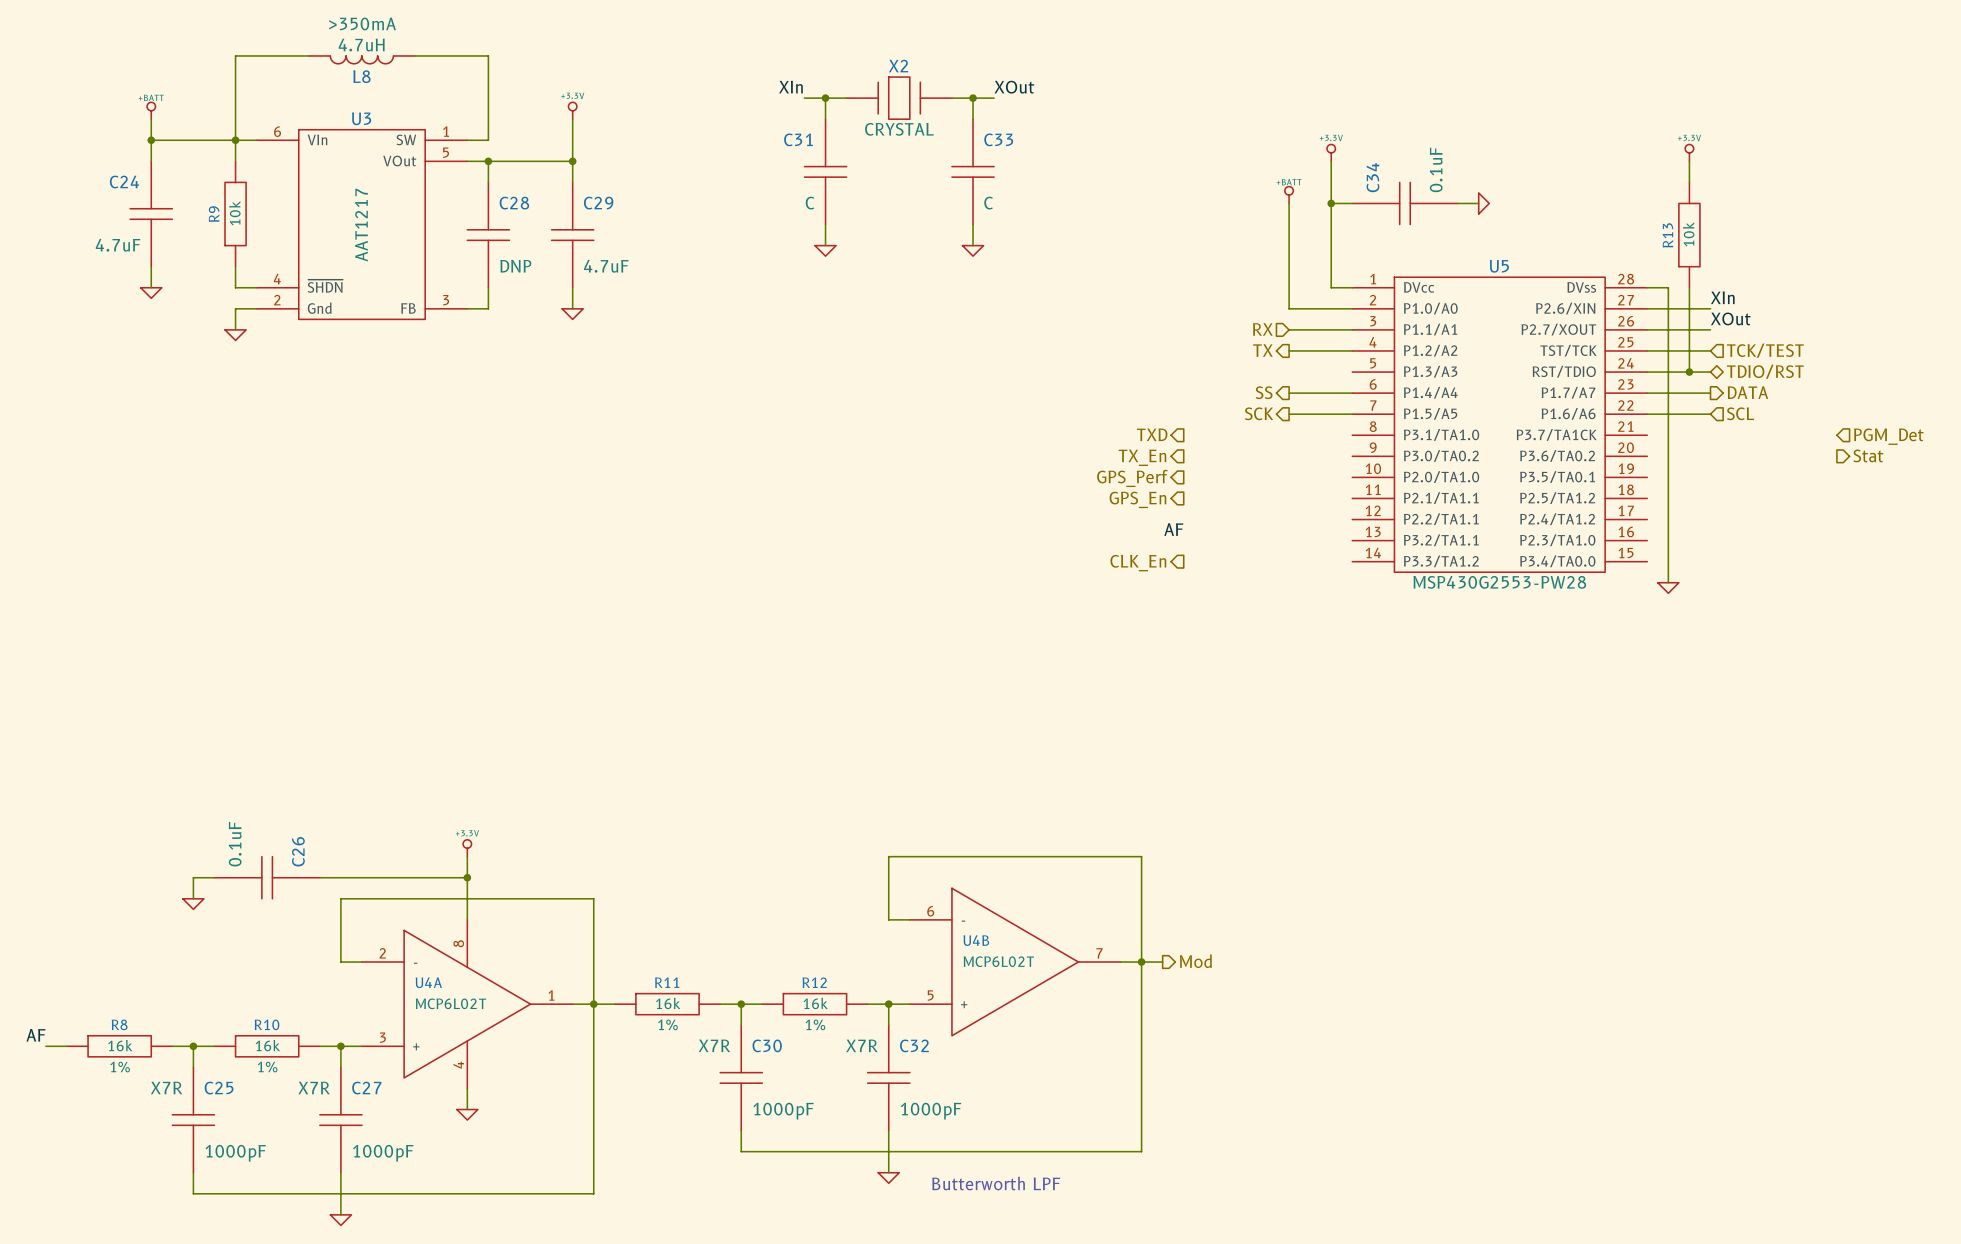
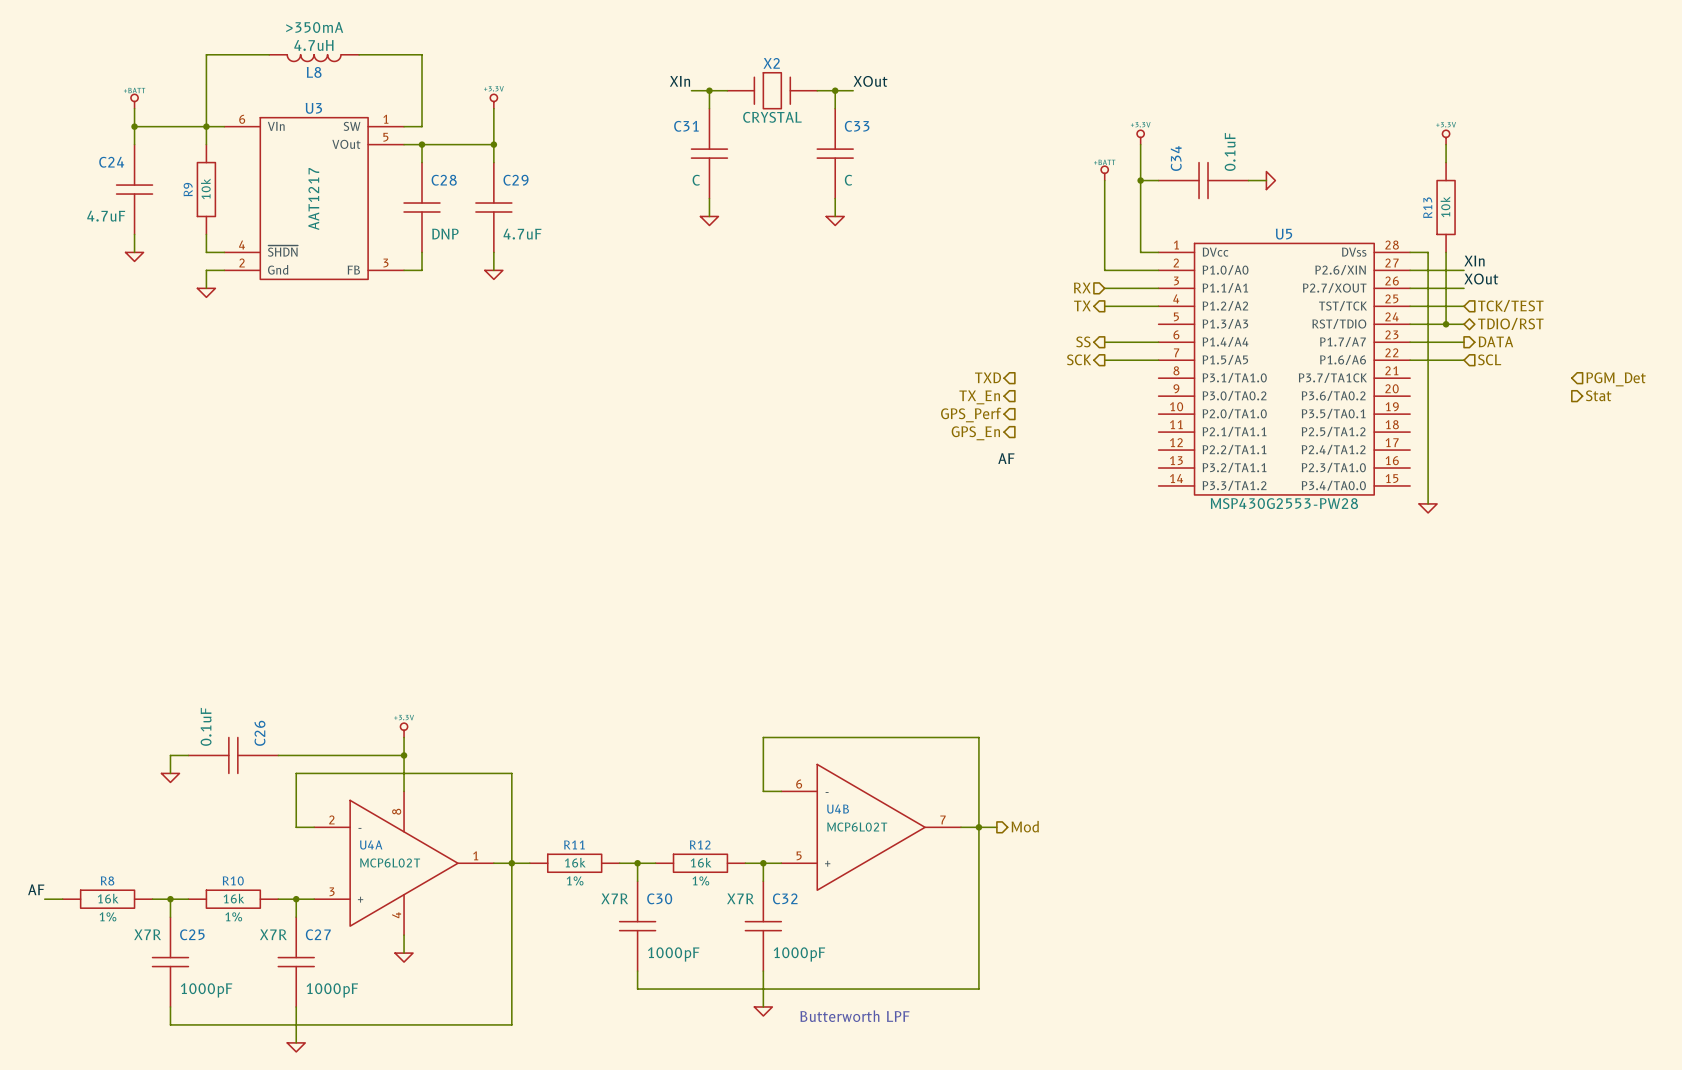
hierarchical label: CLK_En (1138, 563) -> none

